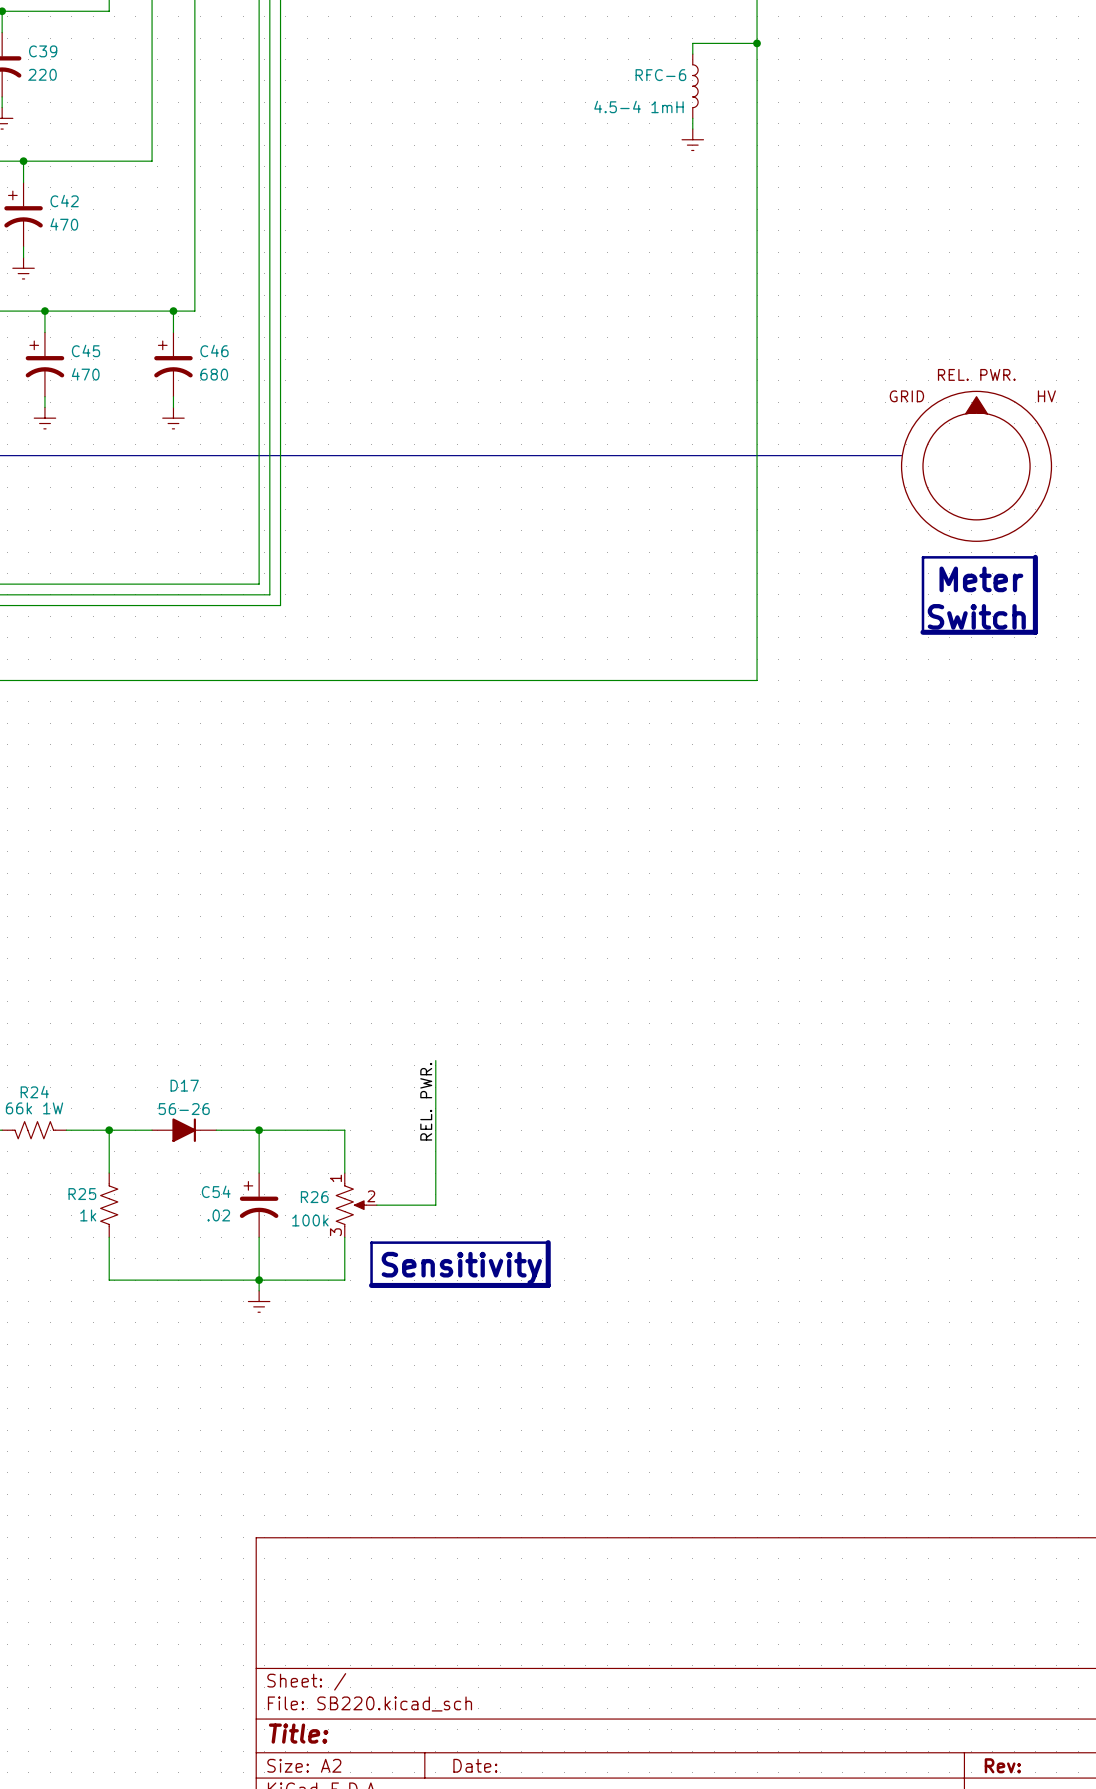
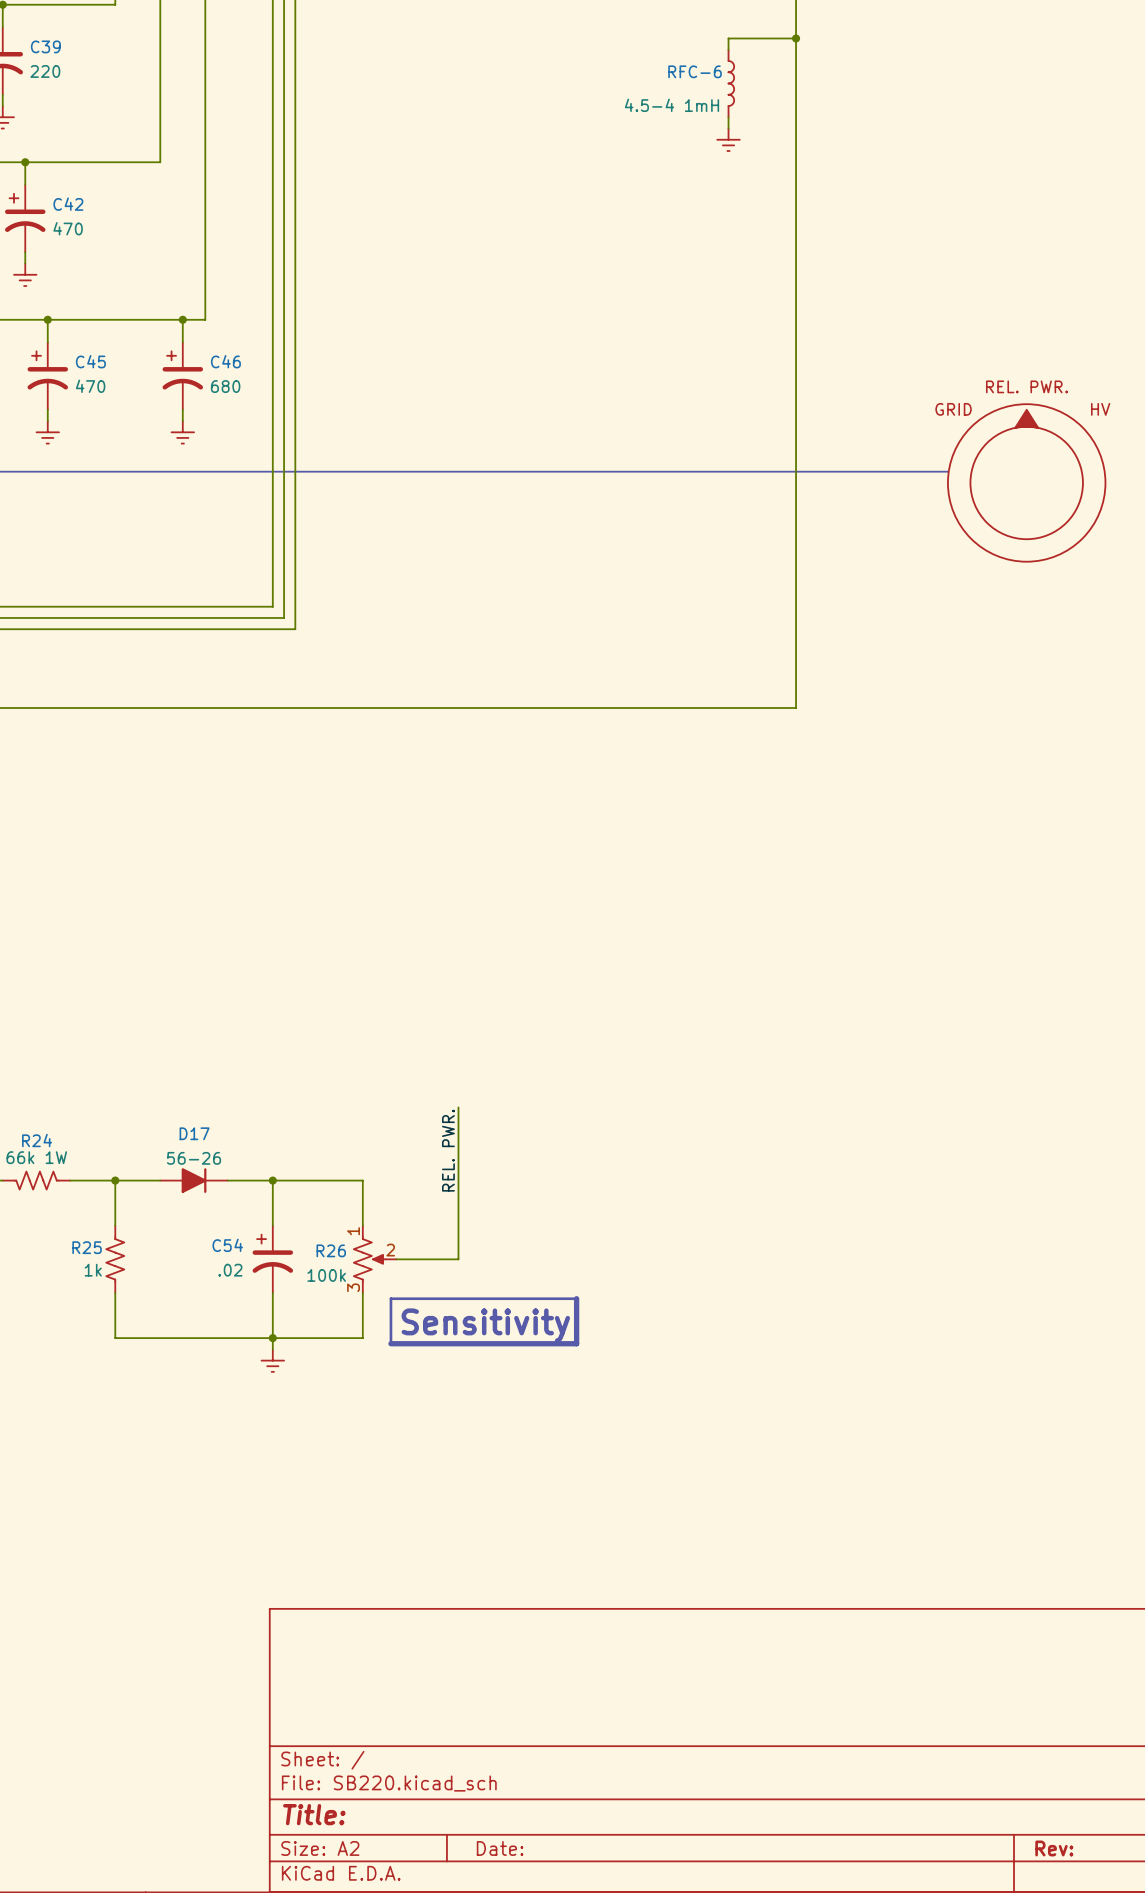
line: (922, 557) (922, 632) (1035, 632) (1035, 557) (922, 557) -> none
text: Meter (981, 579) -> none
text: Switch (976, 616) -> none

